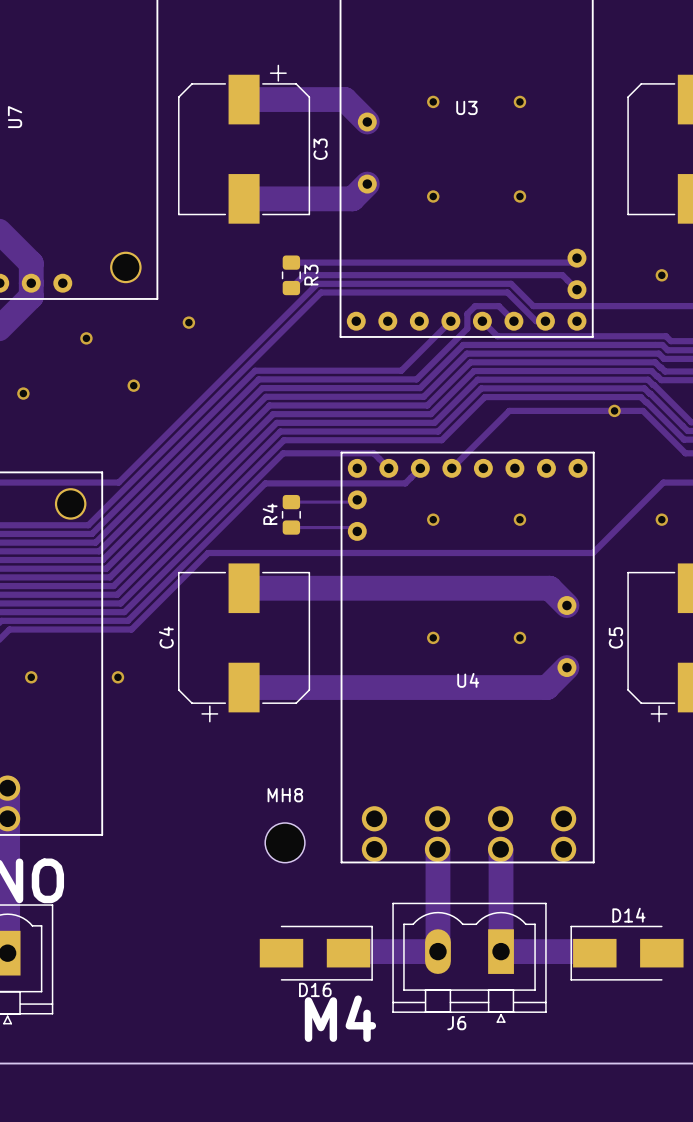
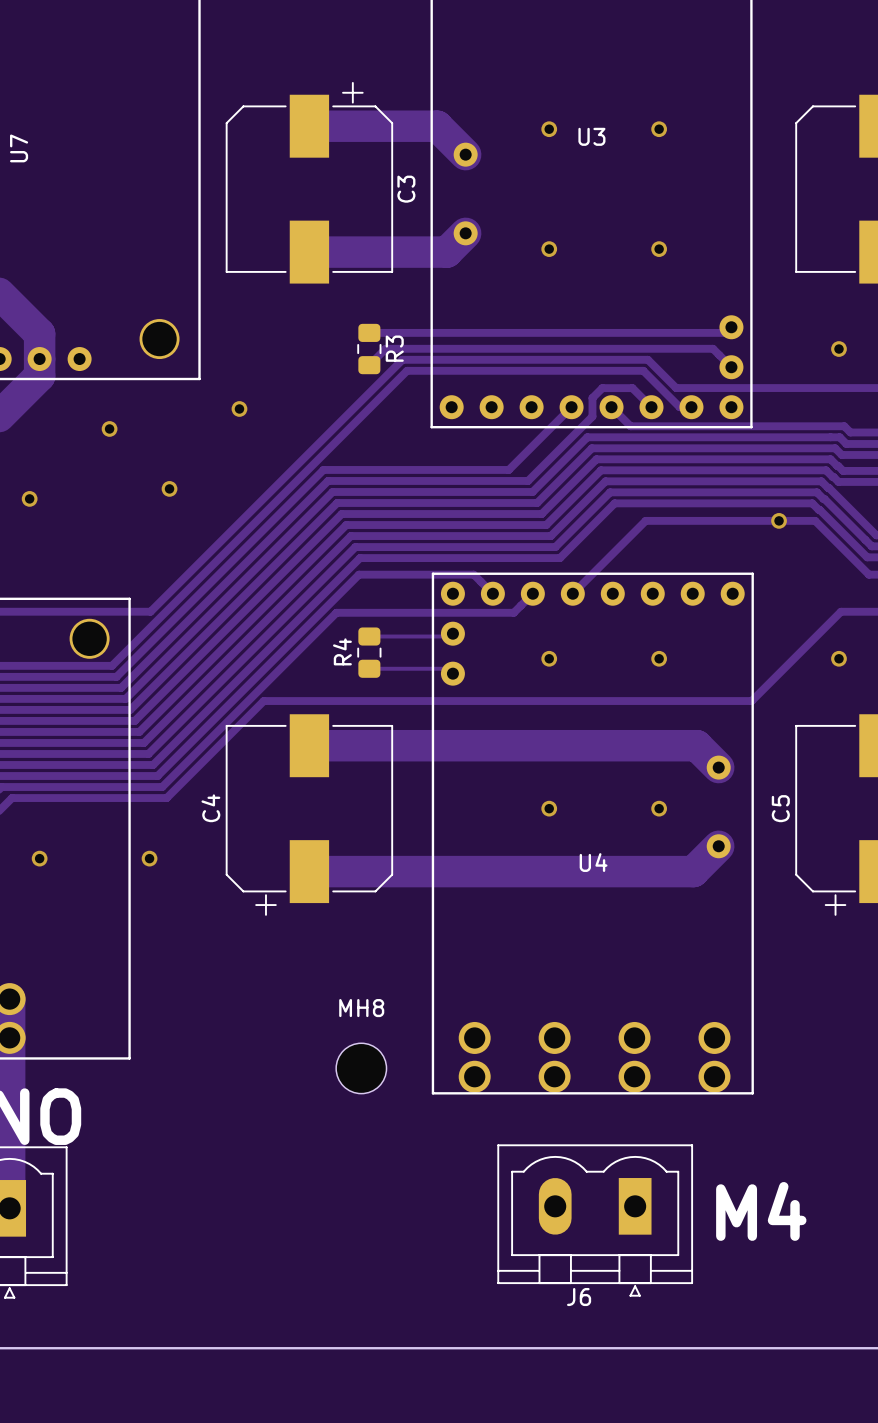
track: (437, 849) (437, 951) (350, 951) (348, 953) -> none
track: (500, 849) (501, 951) (593, 951) (594, 953) -> none
D16: (316, 953) -> none
D14: (627, 953) -> none
text position: M4 (340, 1018) -> M4 (761, 1211)

